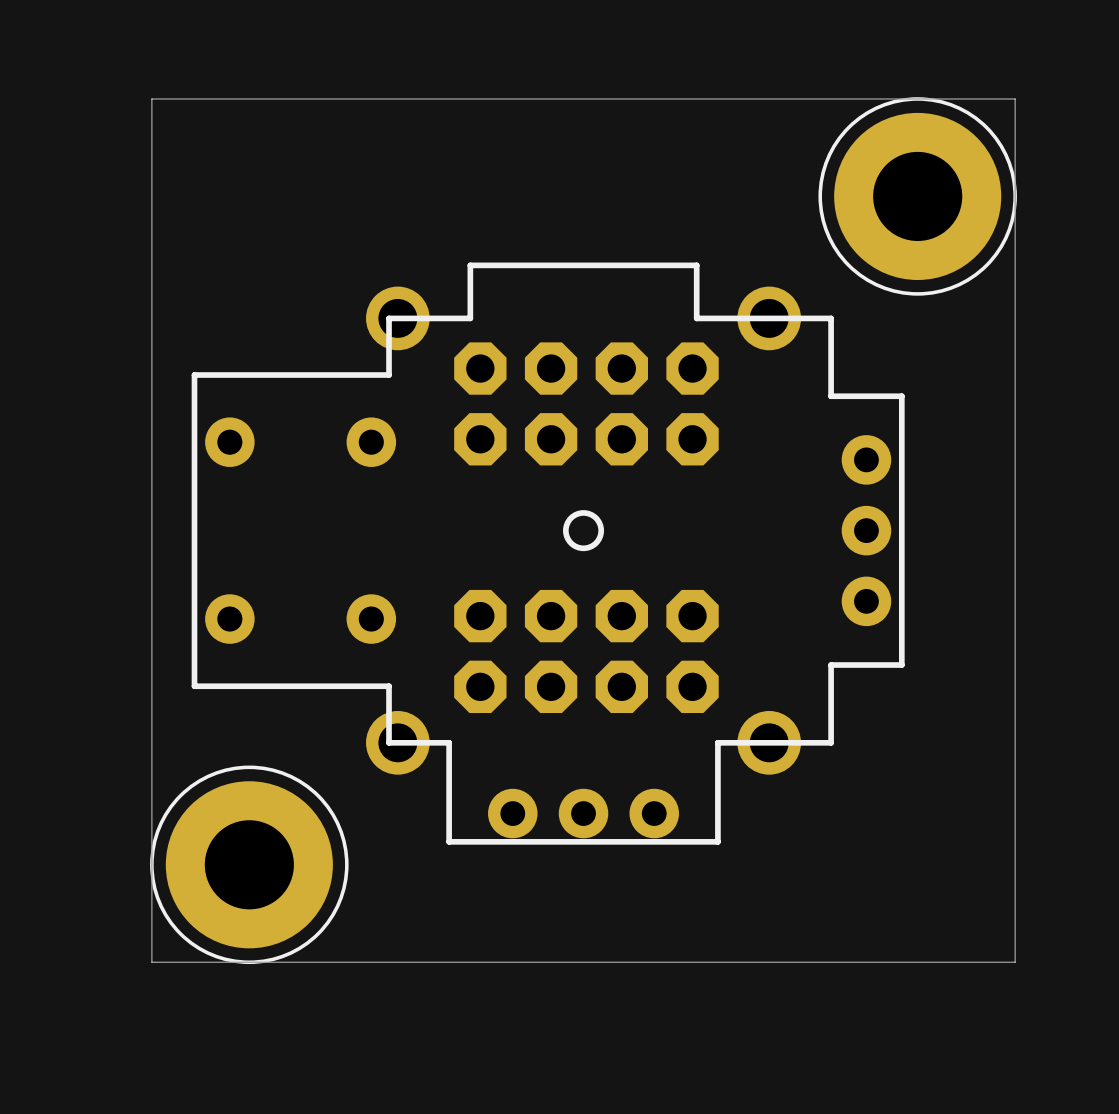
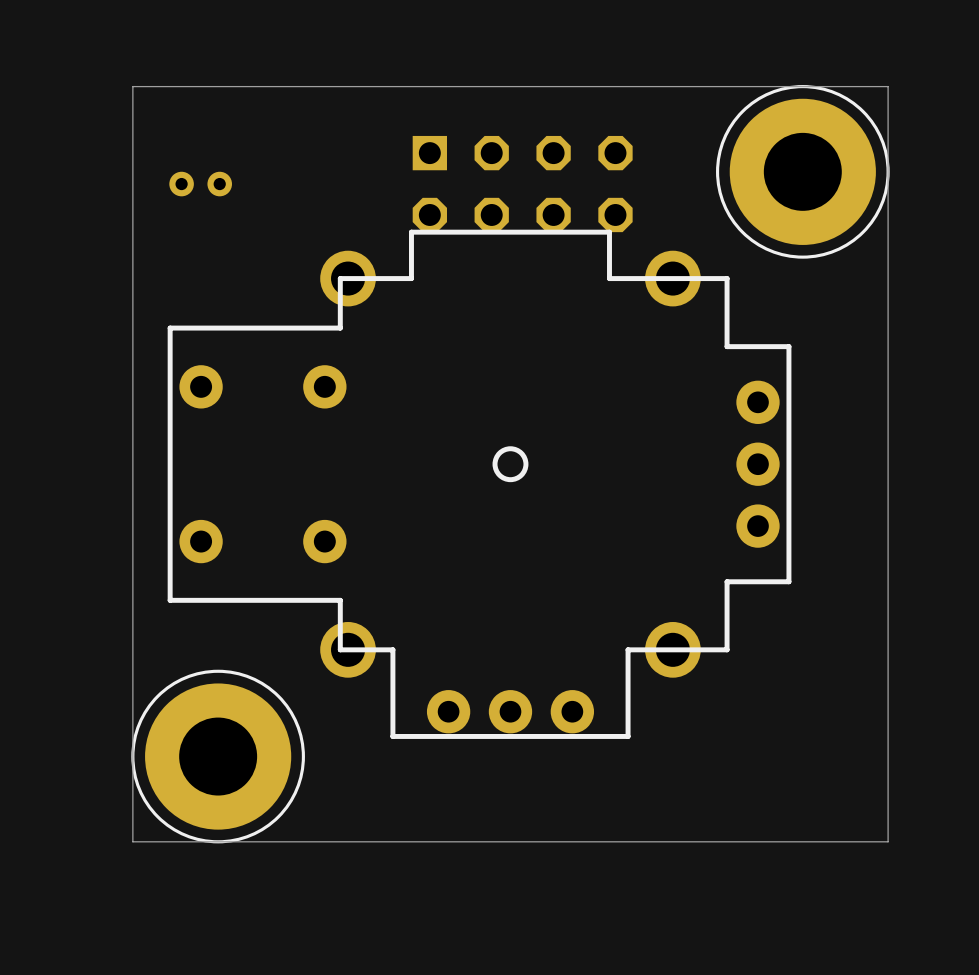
part: none -> (200, 184)
part: none -> (522, 184)
part: (586, 403) -> none
part: (586, 651) -> none

